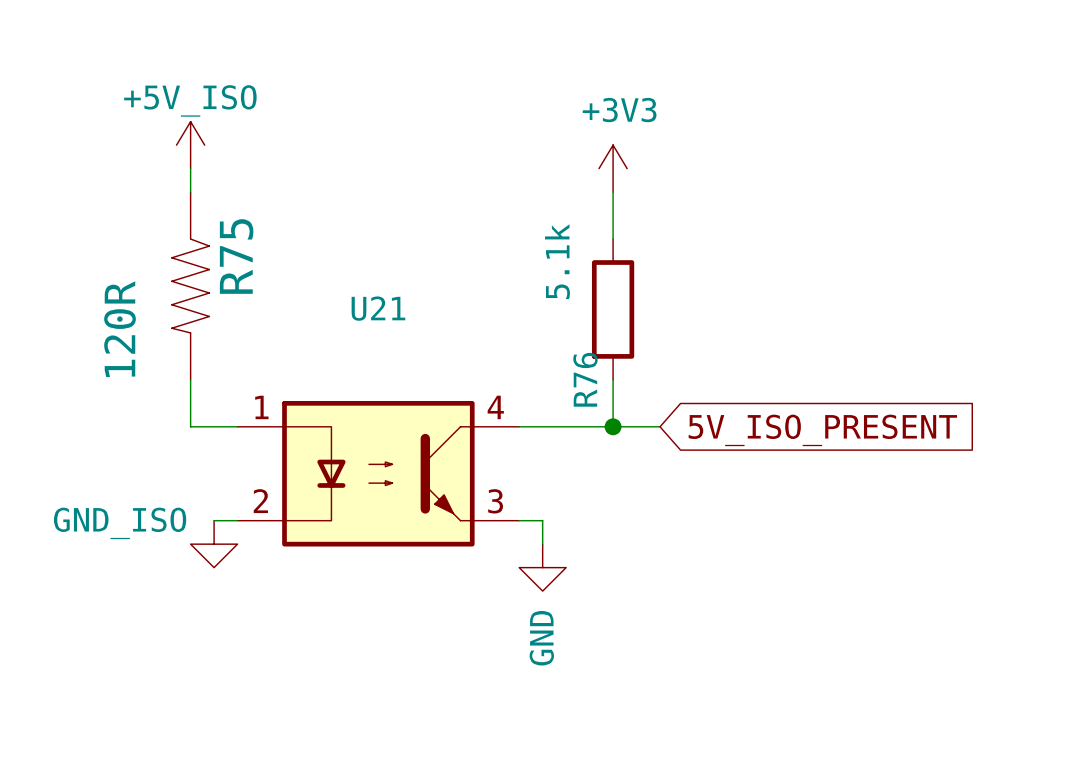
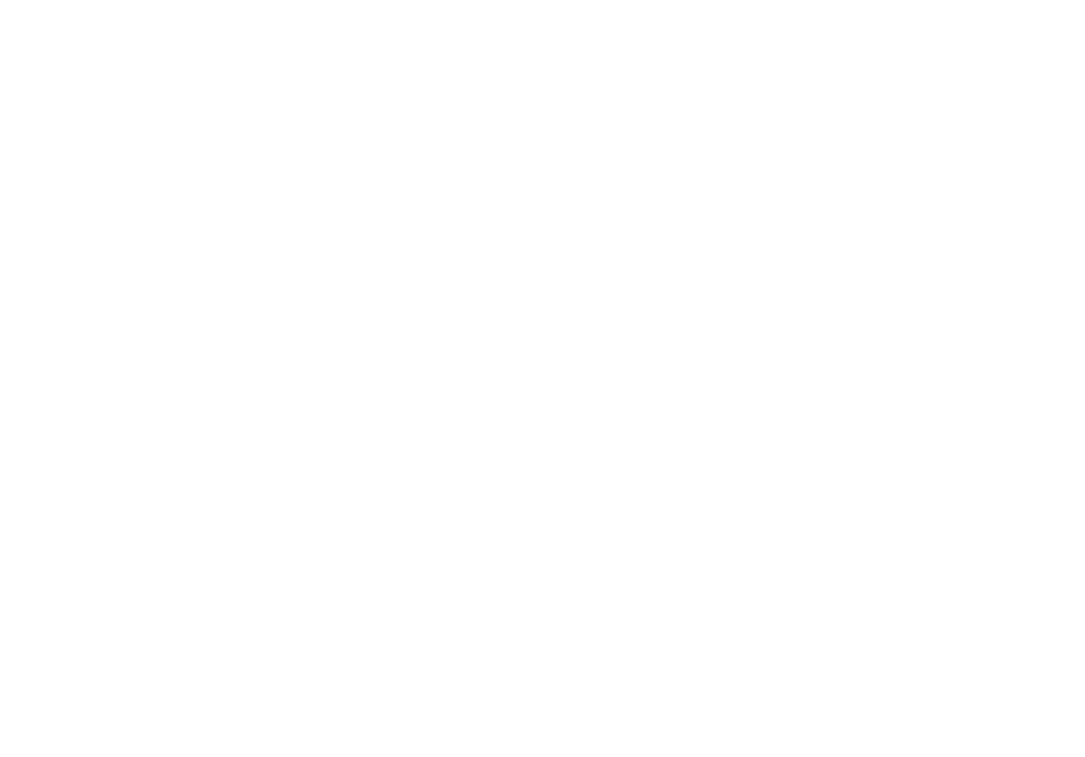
power symbol: +5V_ISO (190, 145) -> none
wire: (190, 168) (190, 192) -> none
power symbol: +3V3 (613, 168) -> none
wire: (613, 192) (613, 239) -> none
R75: 120R (190, 285) -> none
R76: 5.1k (613, 309) -> none
wire: (190, 379) (190, 426) (237, 426) -> none
wire: (613, 379) (613, 426) -> none
wire: (519, 426) (660, 426) -> none
junction: (613, 426) -> none
global label: 5V_ISO_PRESENT (822, 430) -> none
U21: (378, 473) -> none
wire: (214, 520) (237, 520) -> none
wire: (519, 520) (542, 520) (542, 544) -> none
power symbol: GND_ISO (214, 544) -> none
power symbol: GND (542, 567) -> none

